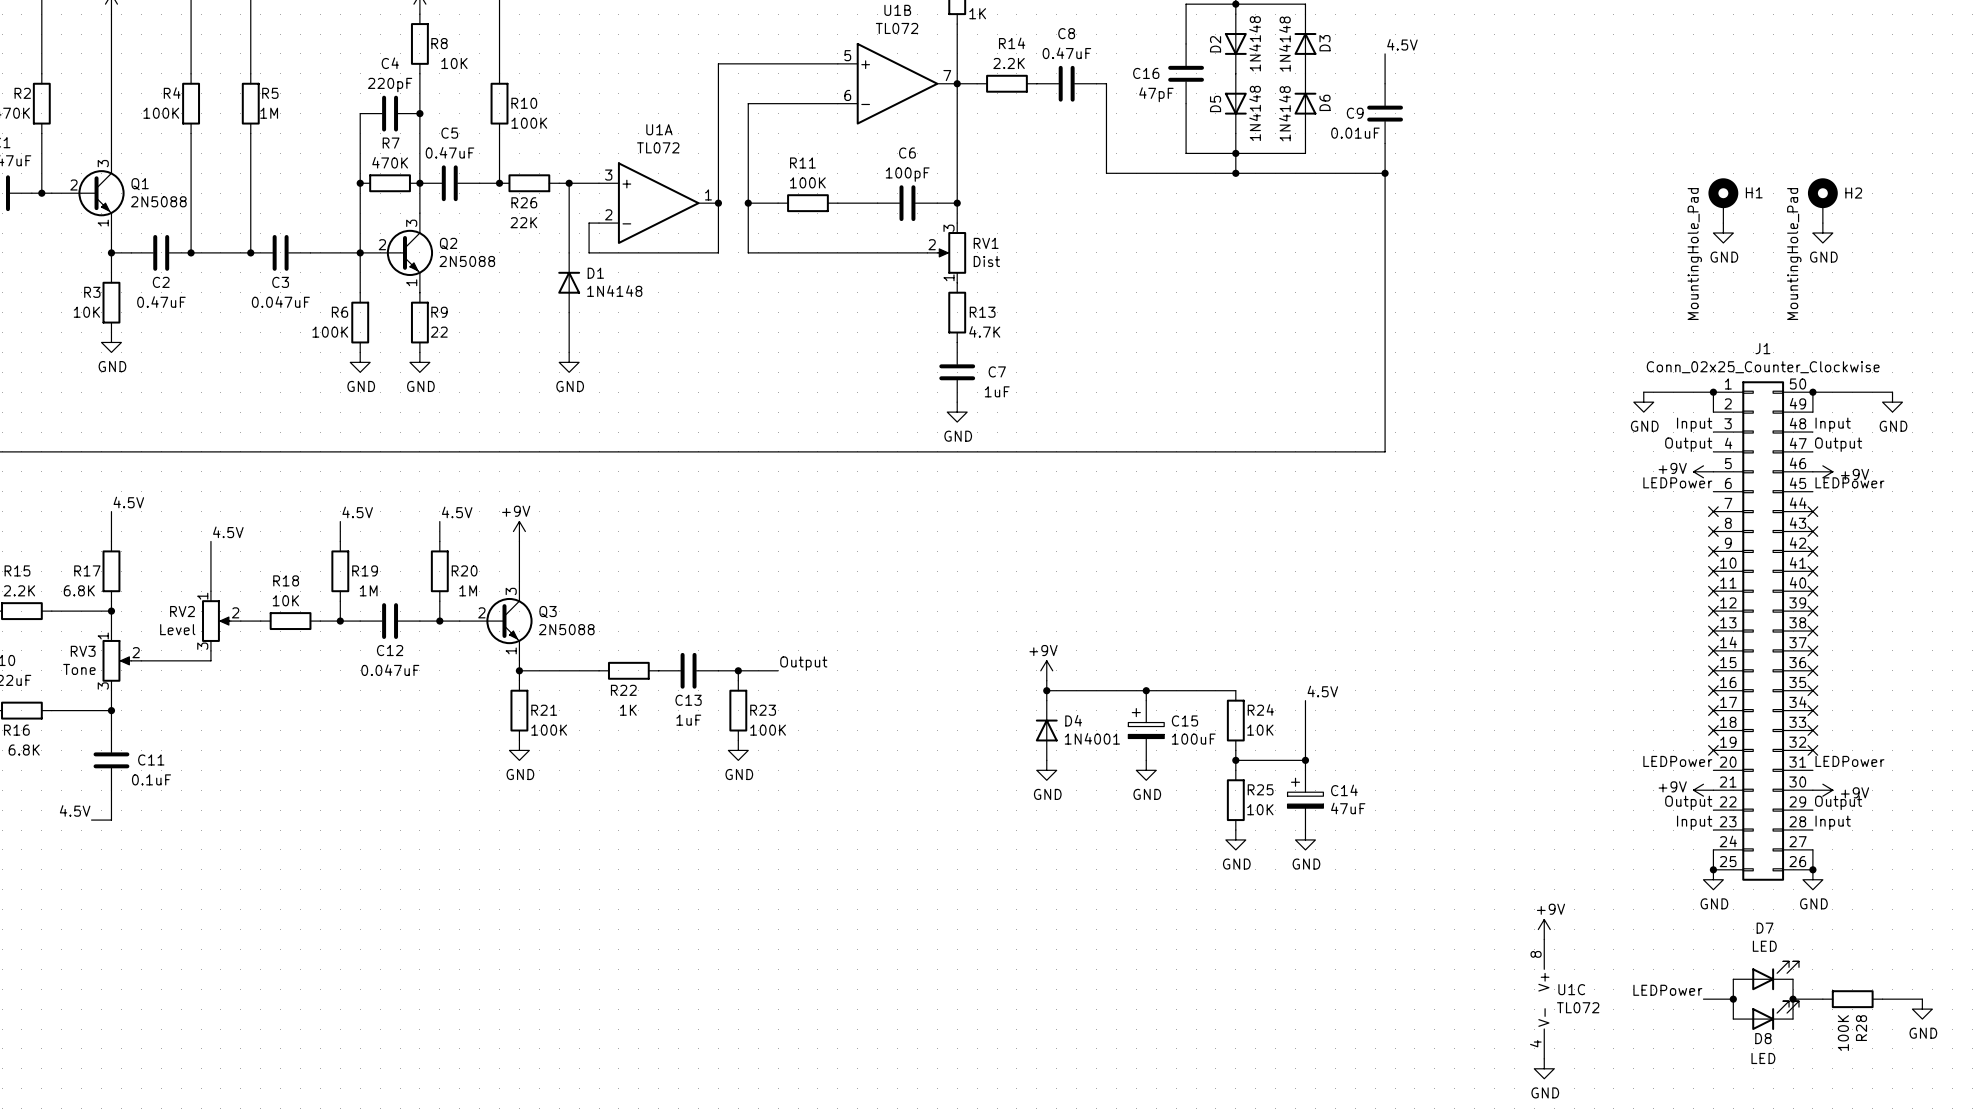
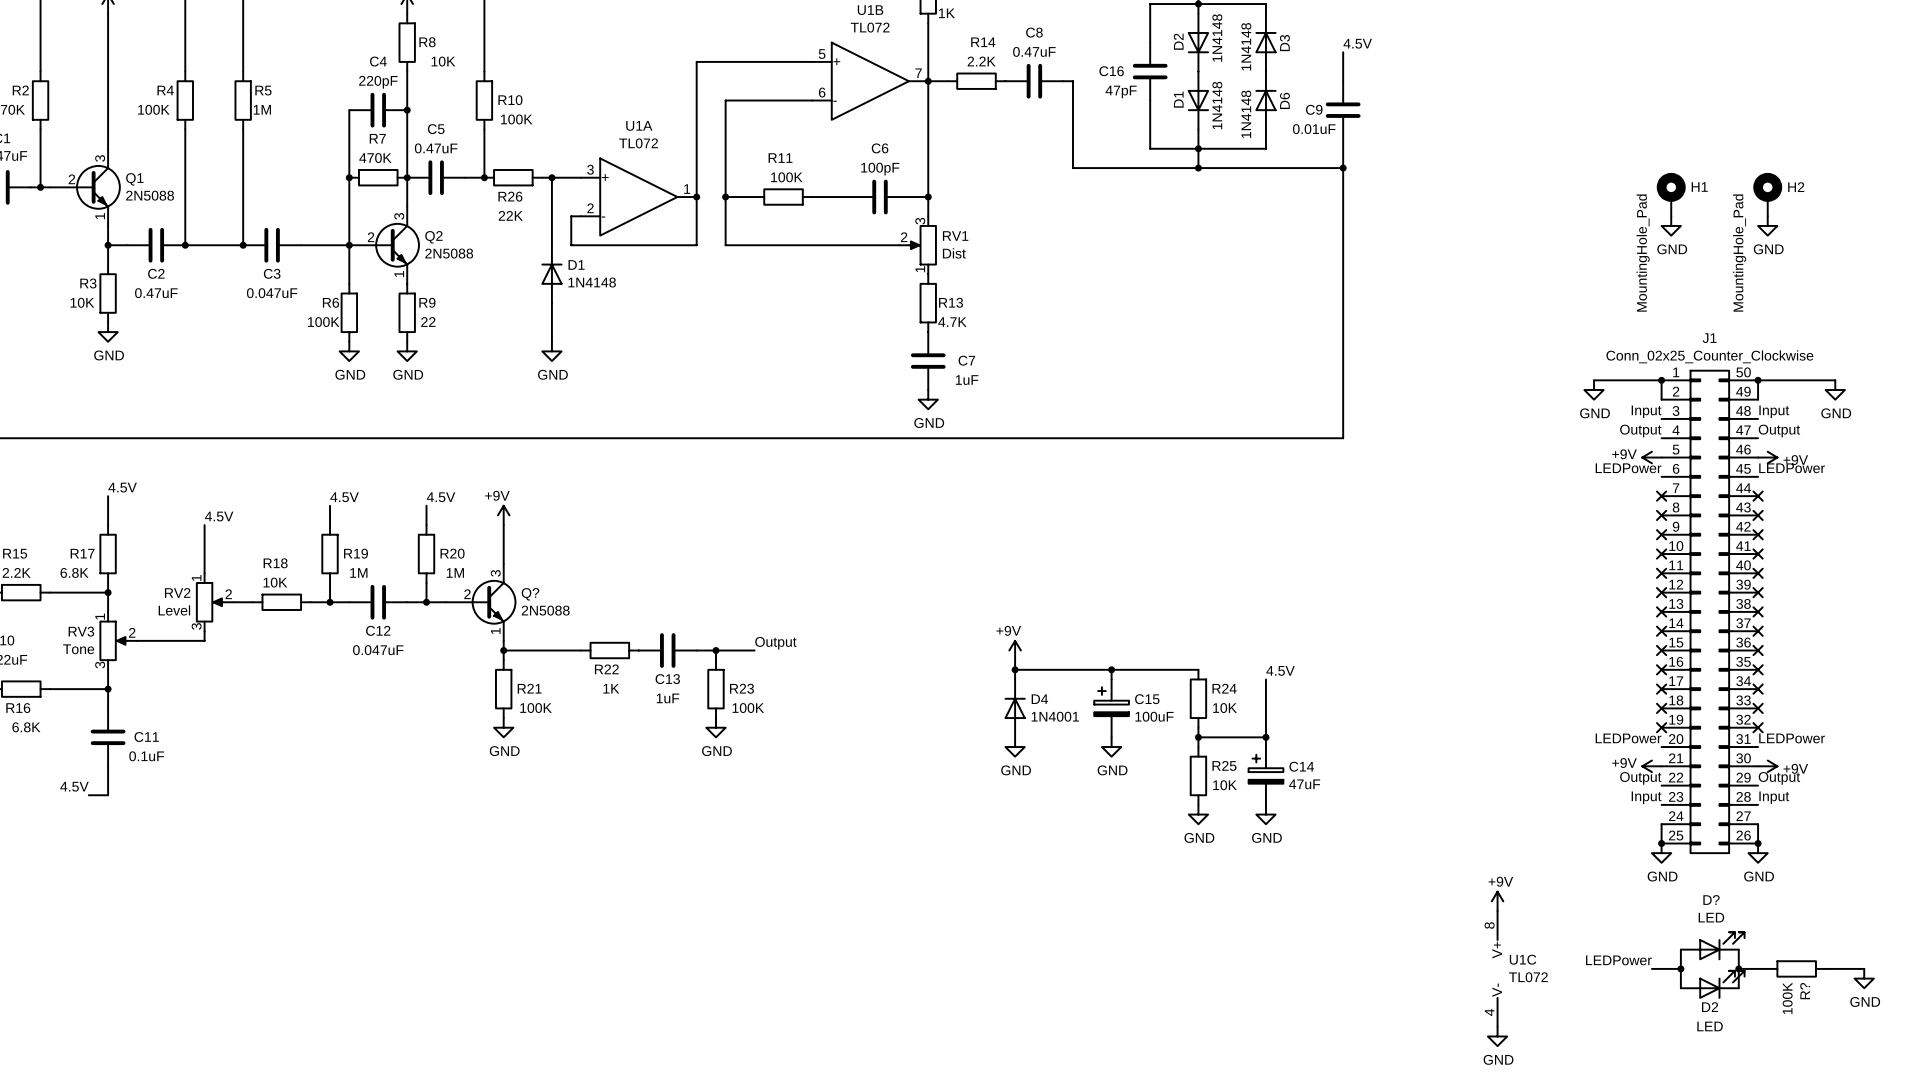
D5 name: D5 (1215, 103) -> D1 (1178, 99)
Q3 name: Q3 (548, 612) -> Q? (530, 594)
D7 name: D7 (1765, 928) -> D? (1711, 899)
R28 name: R28 (1861, 1028) -> R? (1805, 991)
D8 name: D8 (1763, 1038) -> D2 (1710, 1007)

